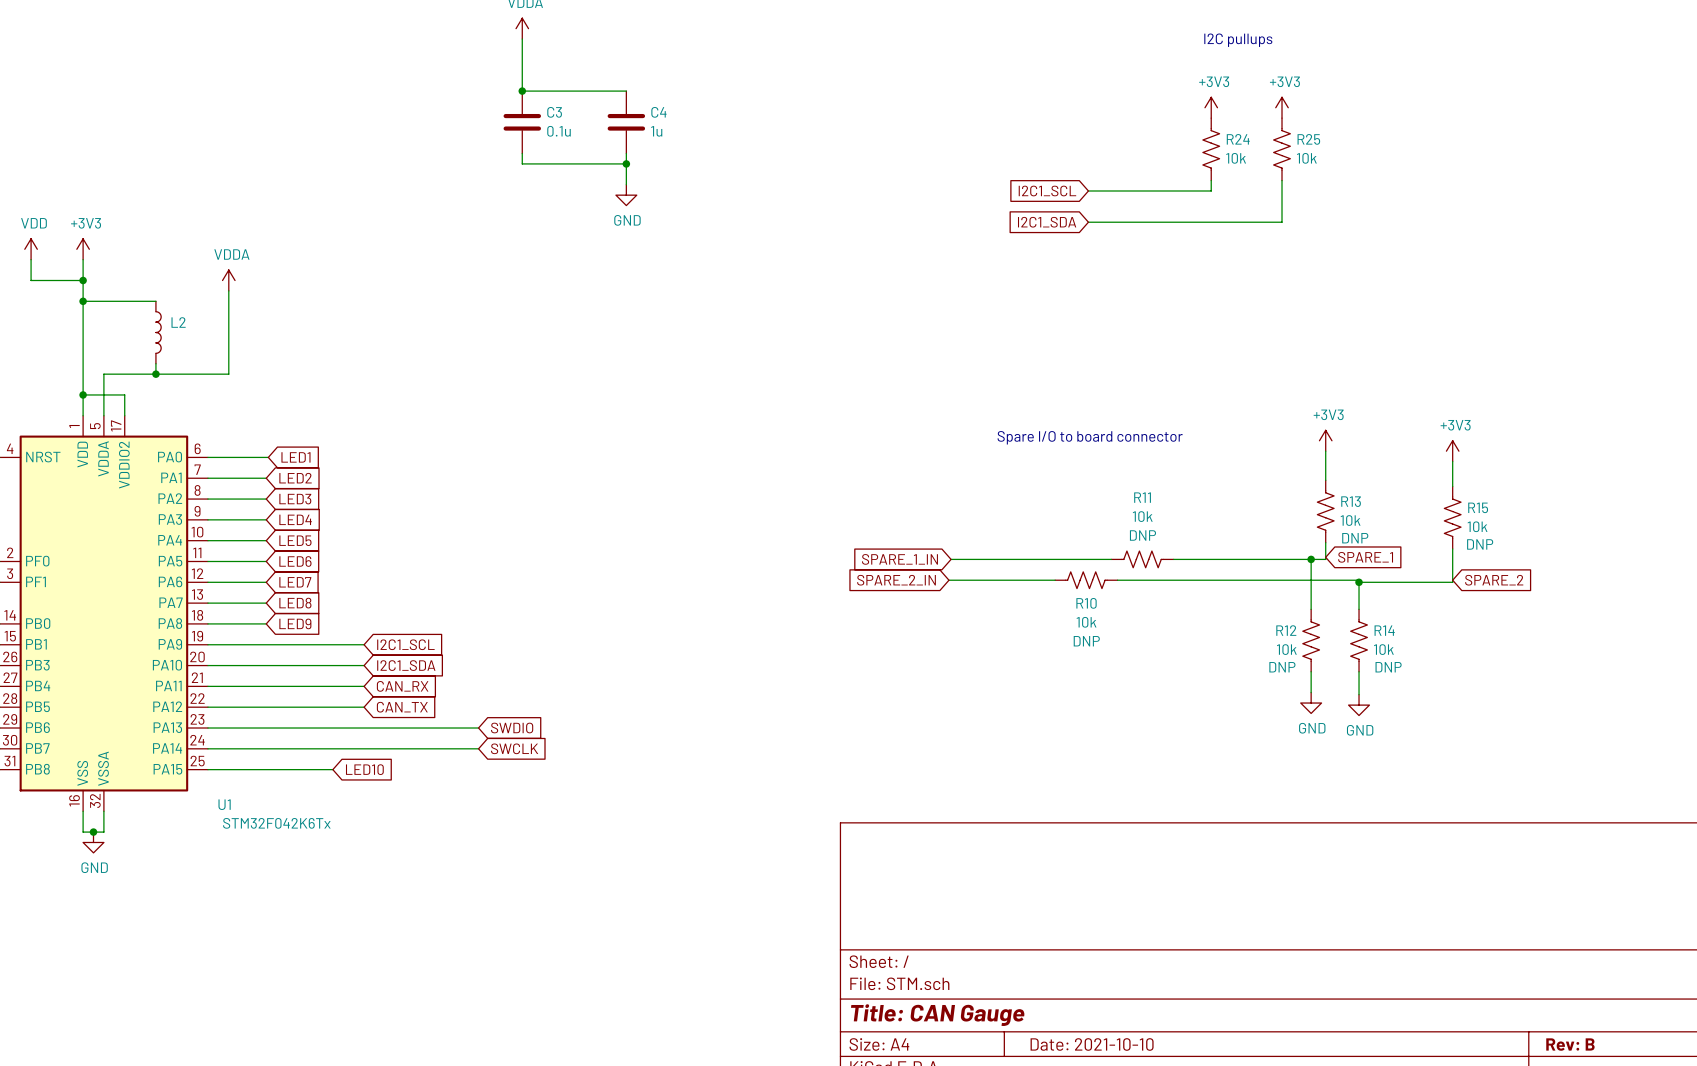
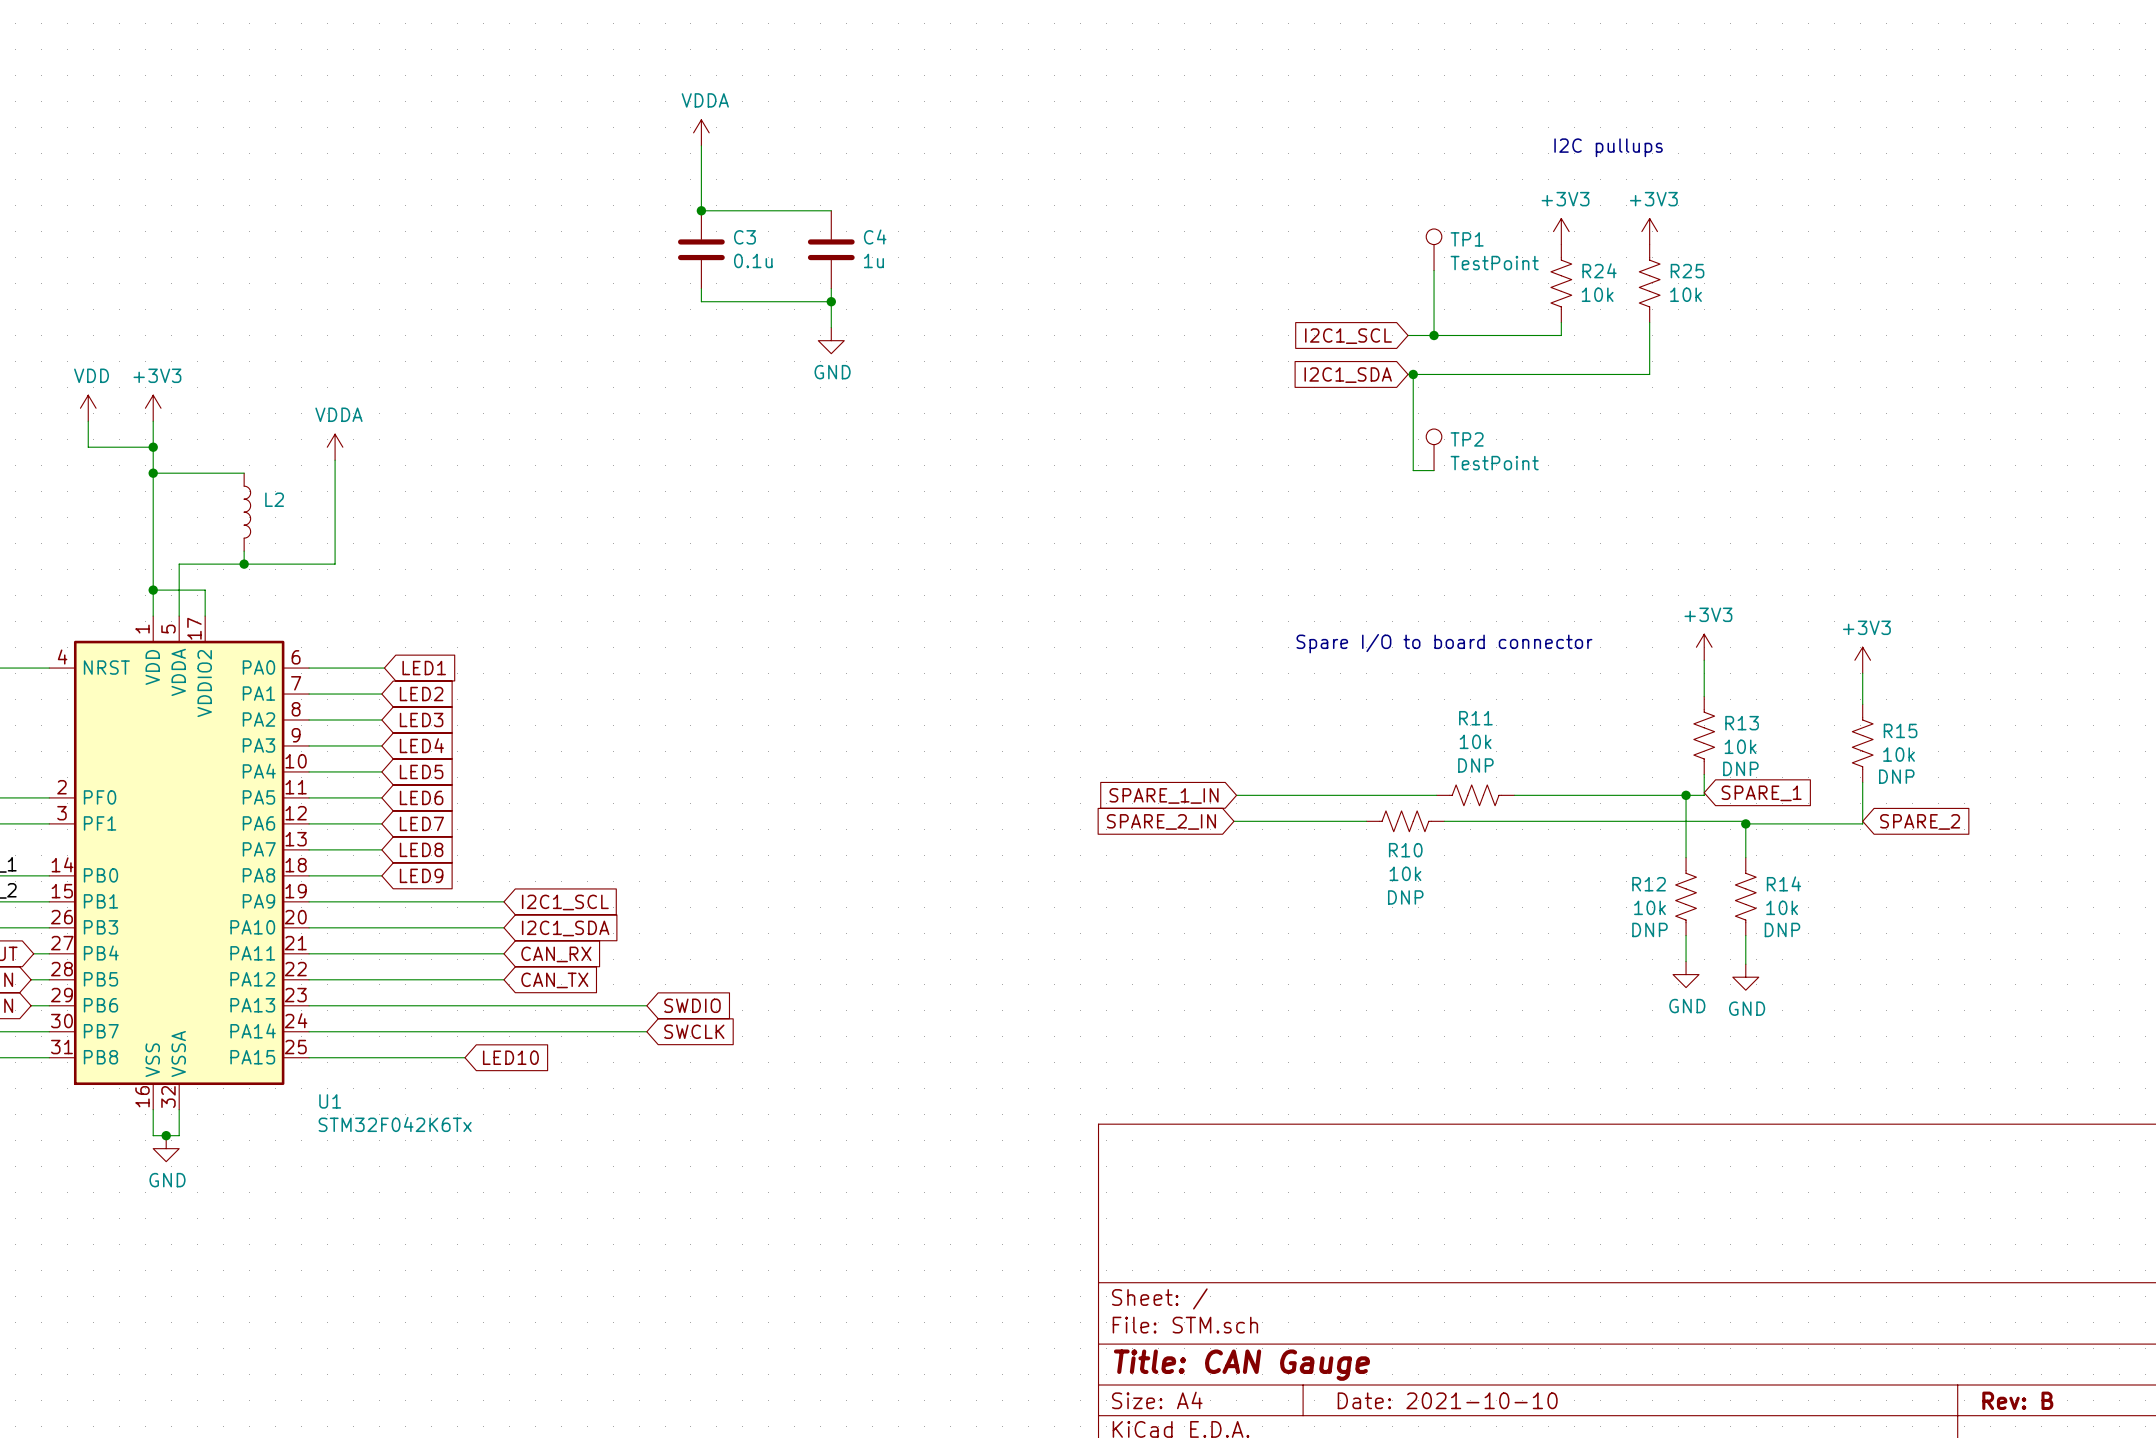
TP1: none -> TestPoint (1434, 249)
wire: none -> (1434, 270) (1434, 335)
junction: none -> (1434, 335)
wire: none -> (1413, 374) (1413, 470) (1434, 470)
junction: none -> (1413, 374)
TP2: none -> TestPoint (1434, 449)

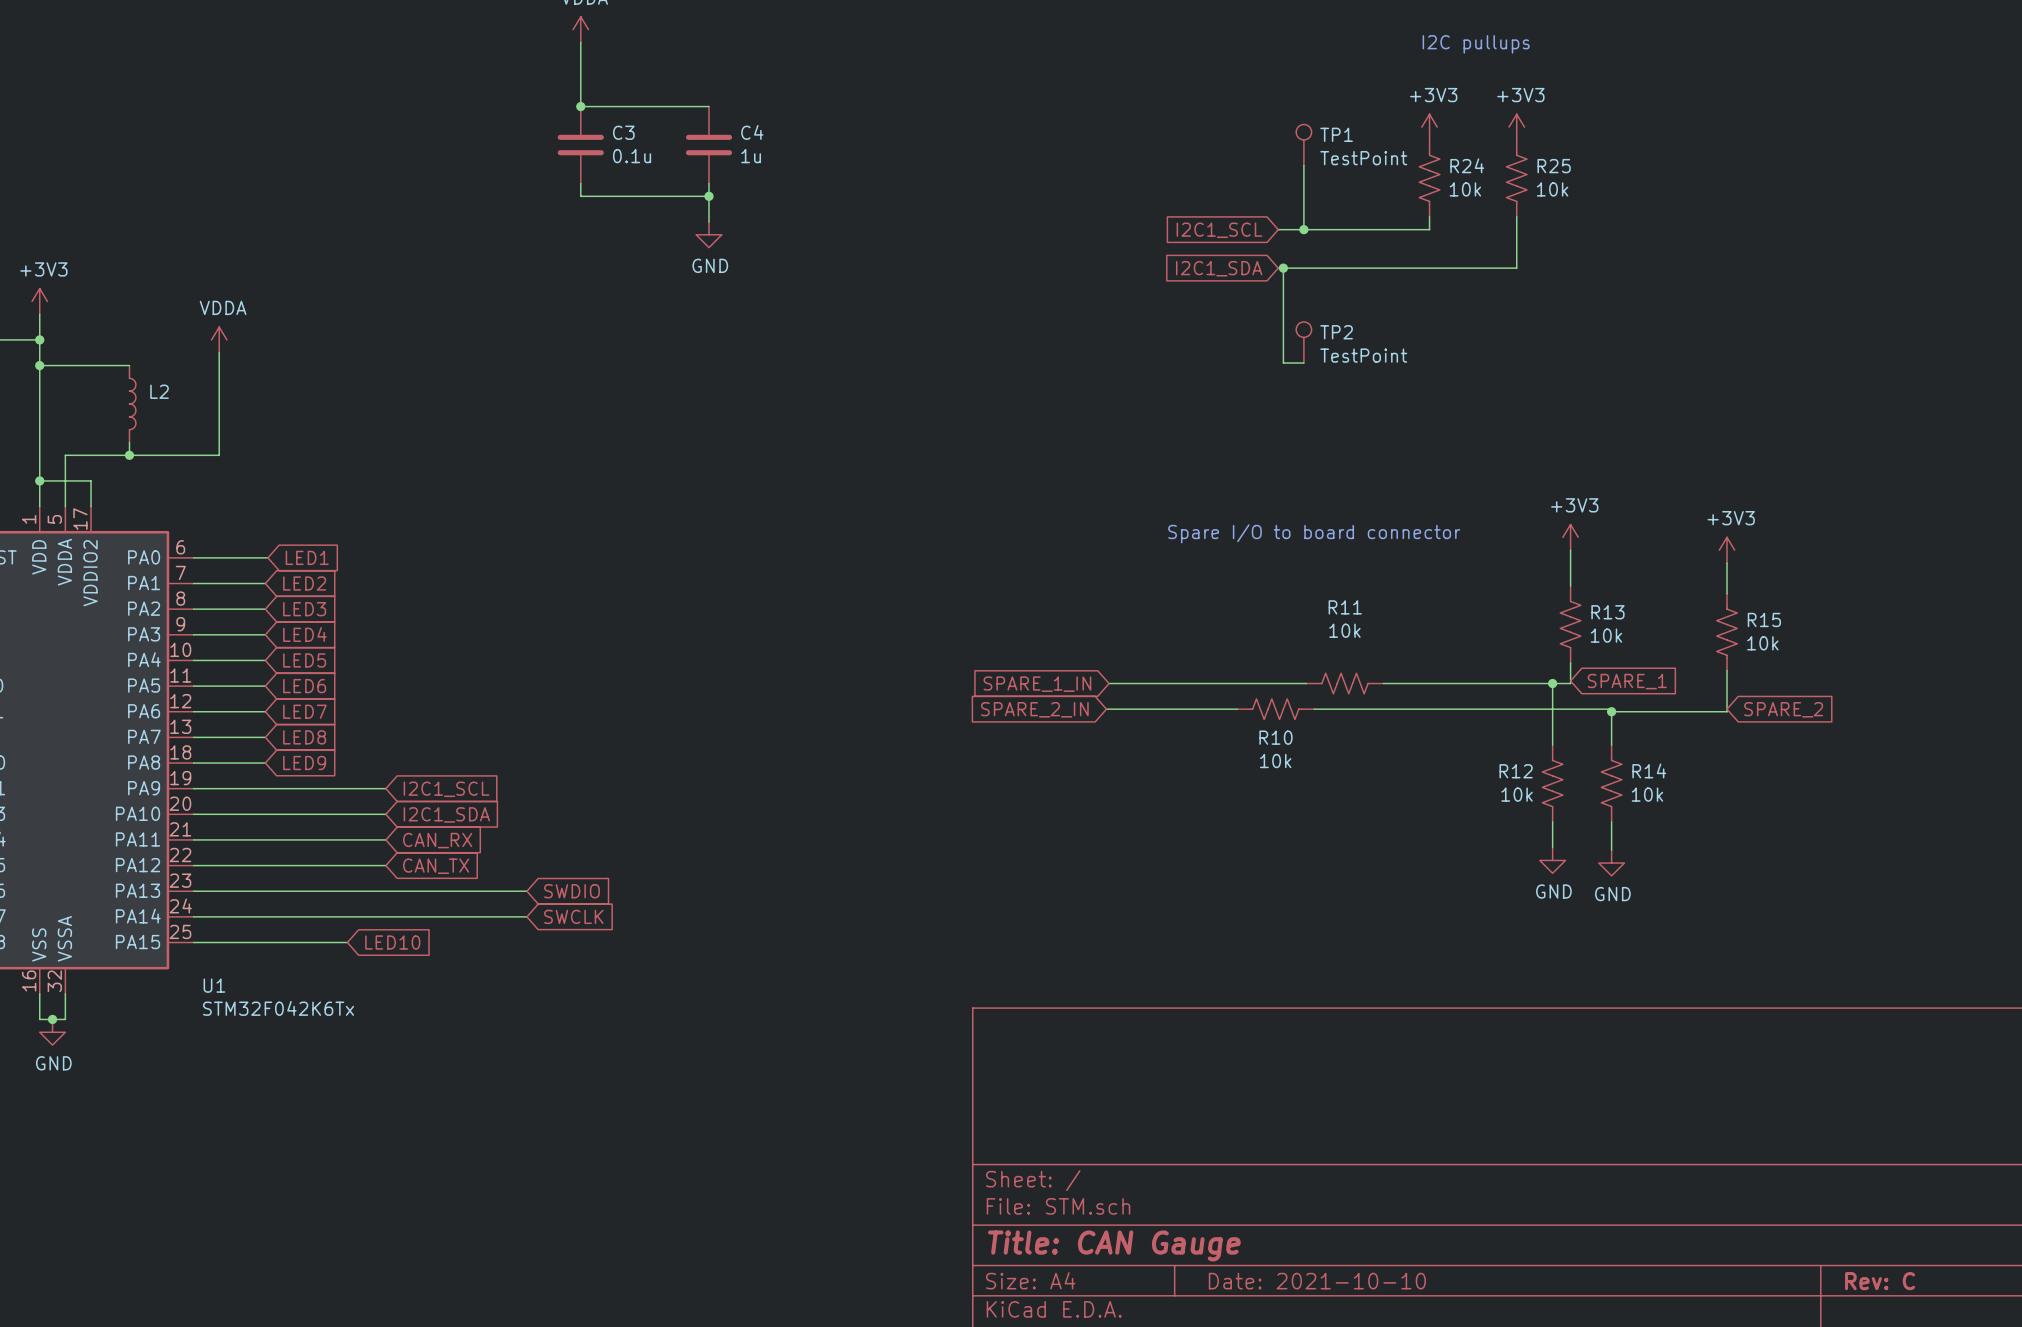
R11 text: DNP (1475, 765) -> none
R13 text: DNP (1740, 768) -> none
R15 text: DNP (1896, 776) -> none
R10 text: DNP (1405, 897) -> none
R12 text: DNP (1649, 929) -> none
R14 text: DNP (1782, 929) -> none
title block: Rev: B (2017, 1400) -> Rev: C (1880, 1281)

